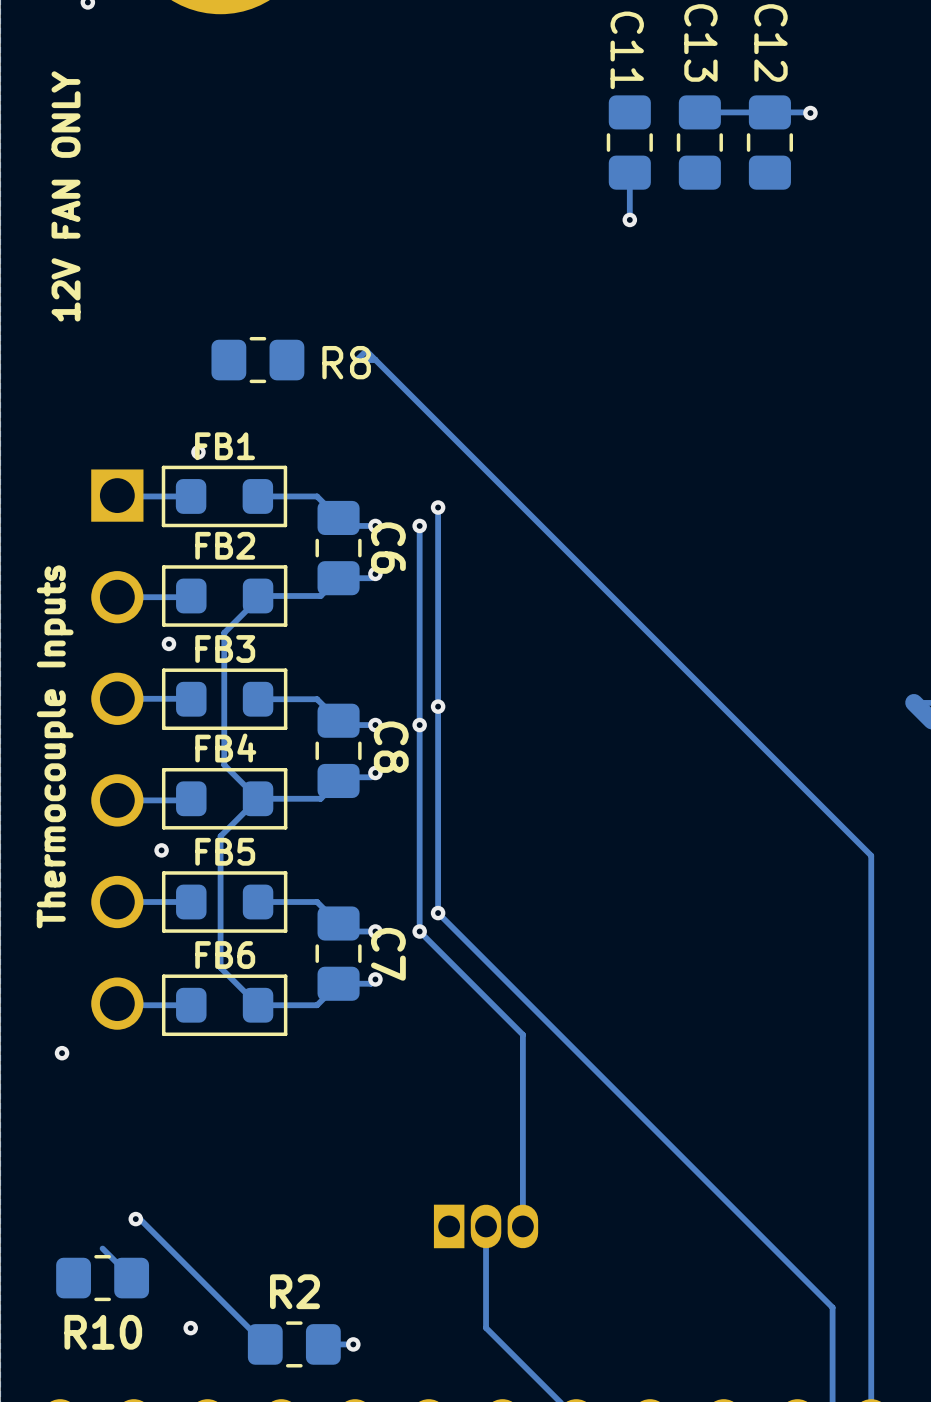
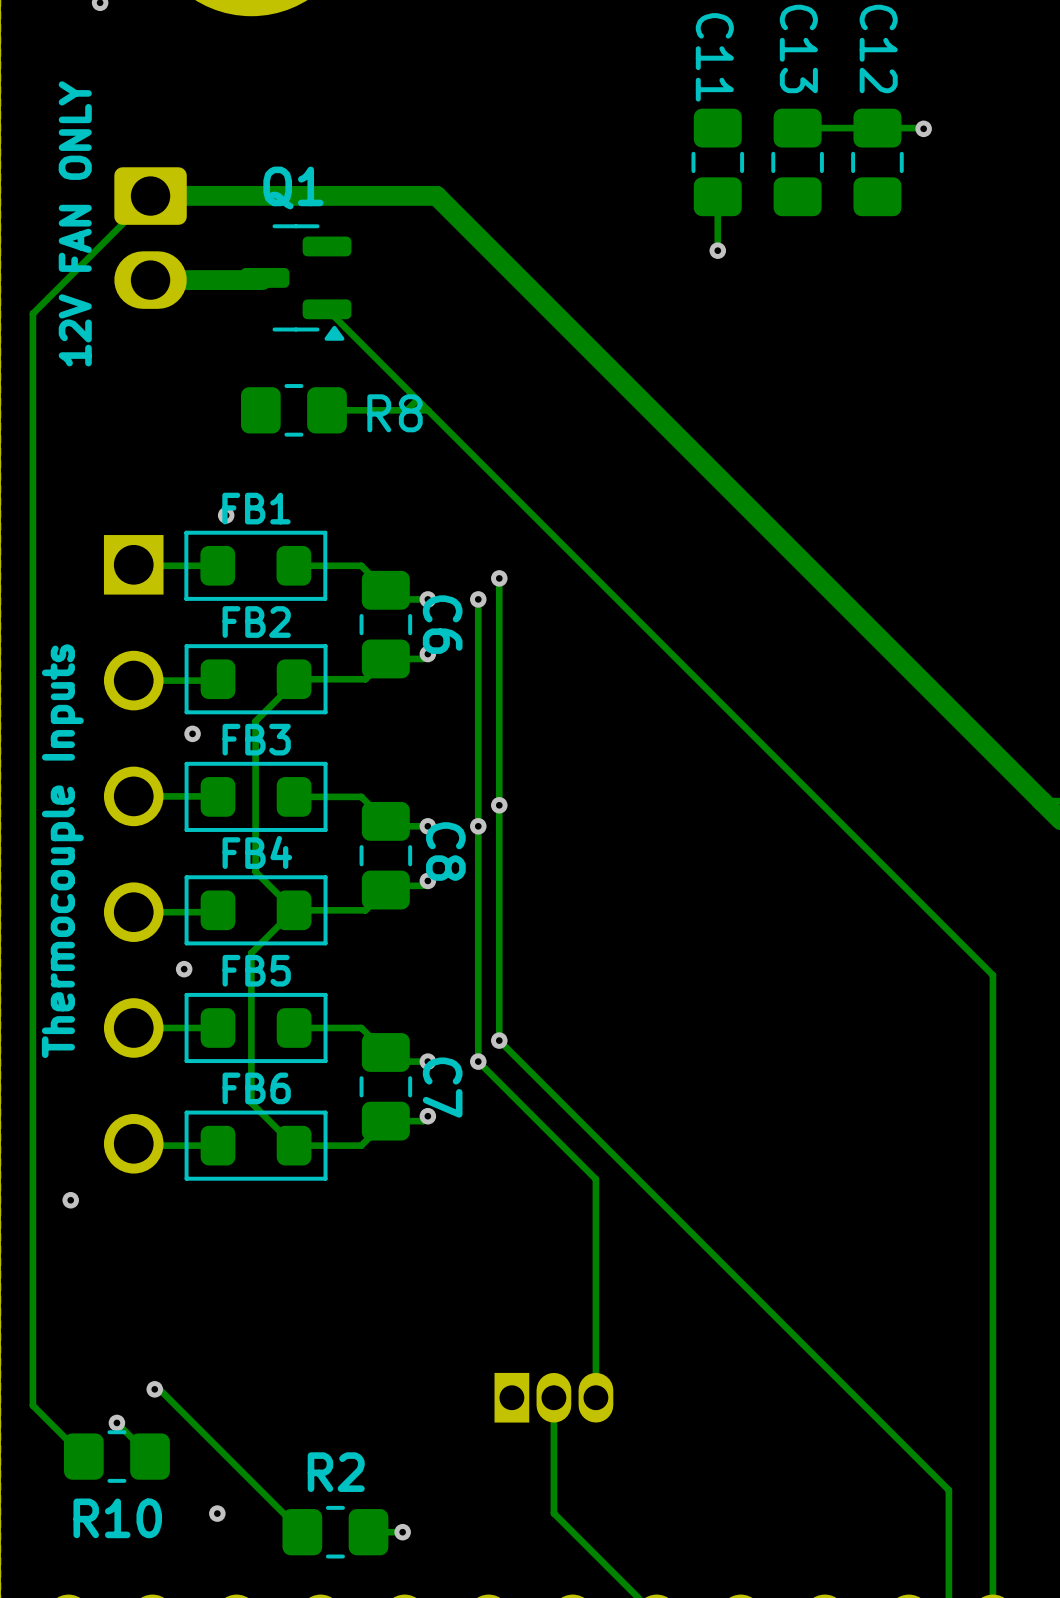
track: none -> (150, 195) (436, 195) (1041, 800)
track: none -> (150, 196) (32, 313) (32, 1405) (83, 1456)
part: none -> (150, 238)
track: none -> (262, 280) (150, 280)
Q1: none -> (296, 282)
track: none -> (327, 309) (417, 399)
track: none -> (406, 410) (327, 410)
via: none -> (116, 1422)

